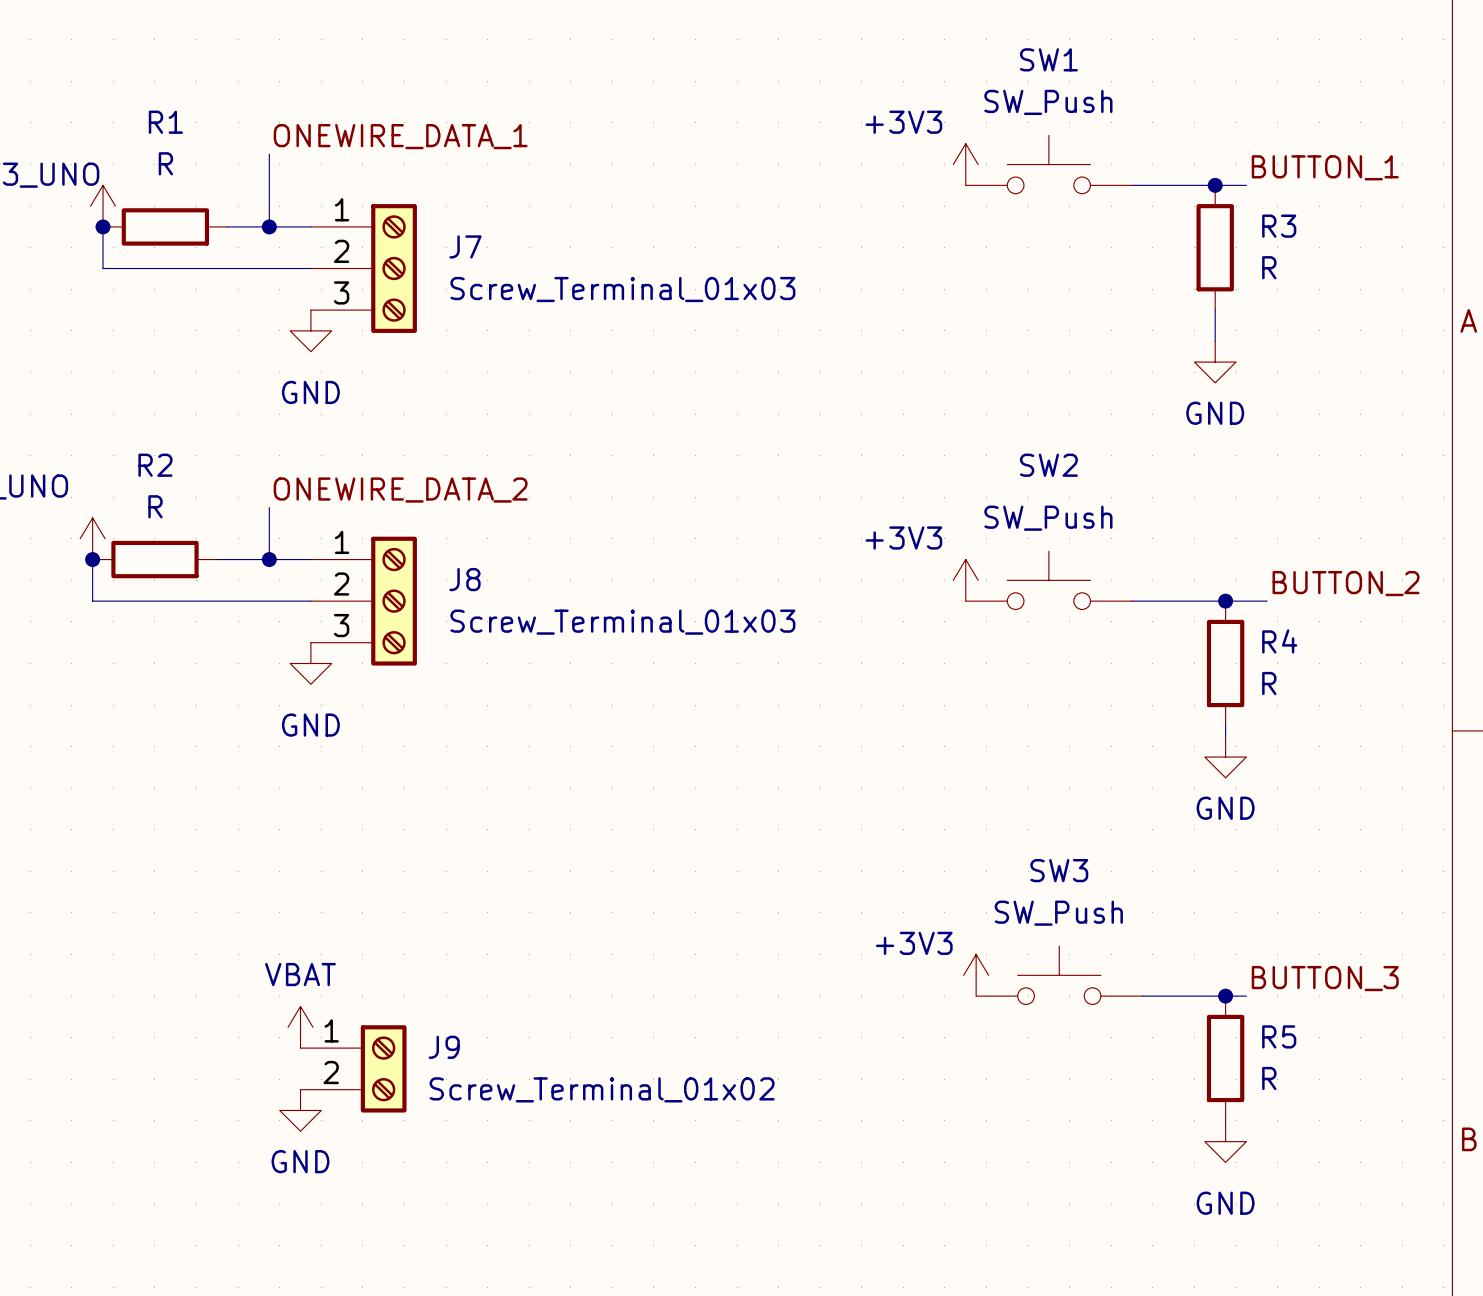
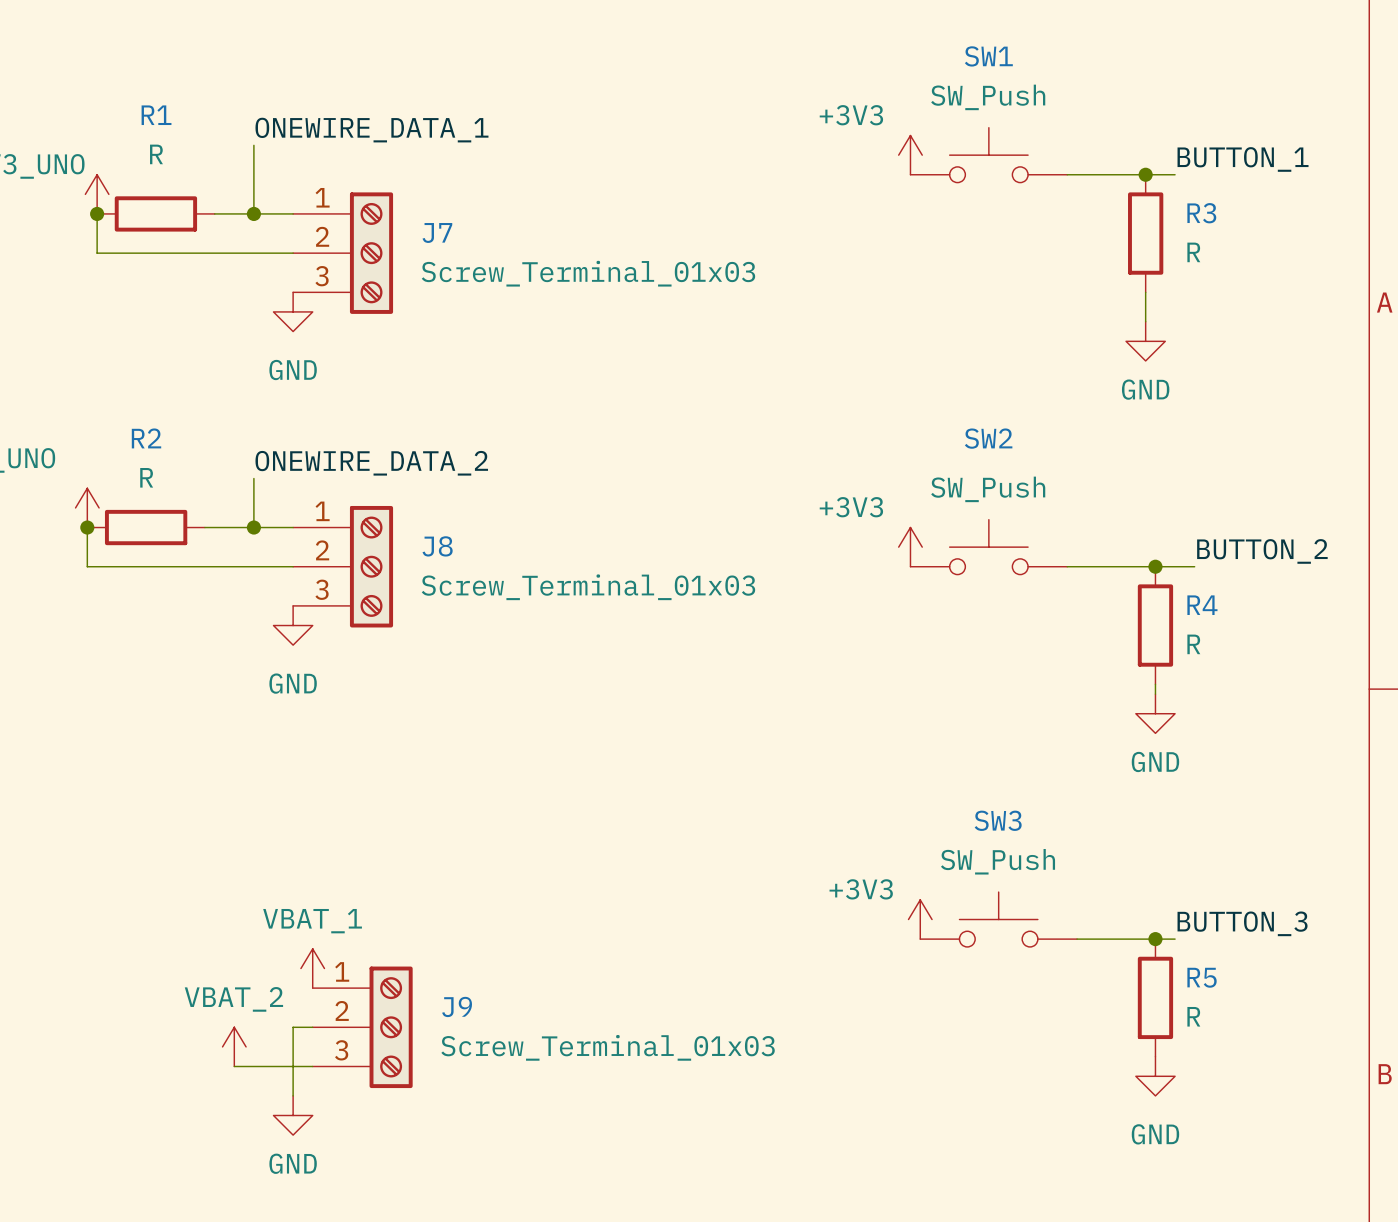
J9 symbol: [300, 1025, 407, 1113] -> [312, 966, 413, 1089]
power symbol: VBAT (300, 1027) -> none
power symbol: none -> VBAT_1 (312, 968)
wire: none -> (312, 1027) (293, 1027) (293, 1095)
J9 value: Screw_Terminal_01x02 (602, 1089) -> Screw_Terminal_01x03 (608, 1047)
power symbol: none -> VBAT_2 (234, 1046)
power symbol position: GND (300, 1110) -> GND (293, 1115)
wire: none -> (234, 1066) (312, 1066)

